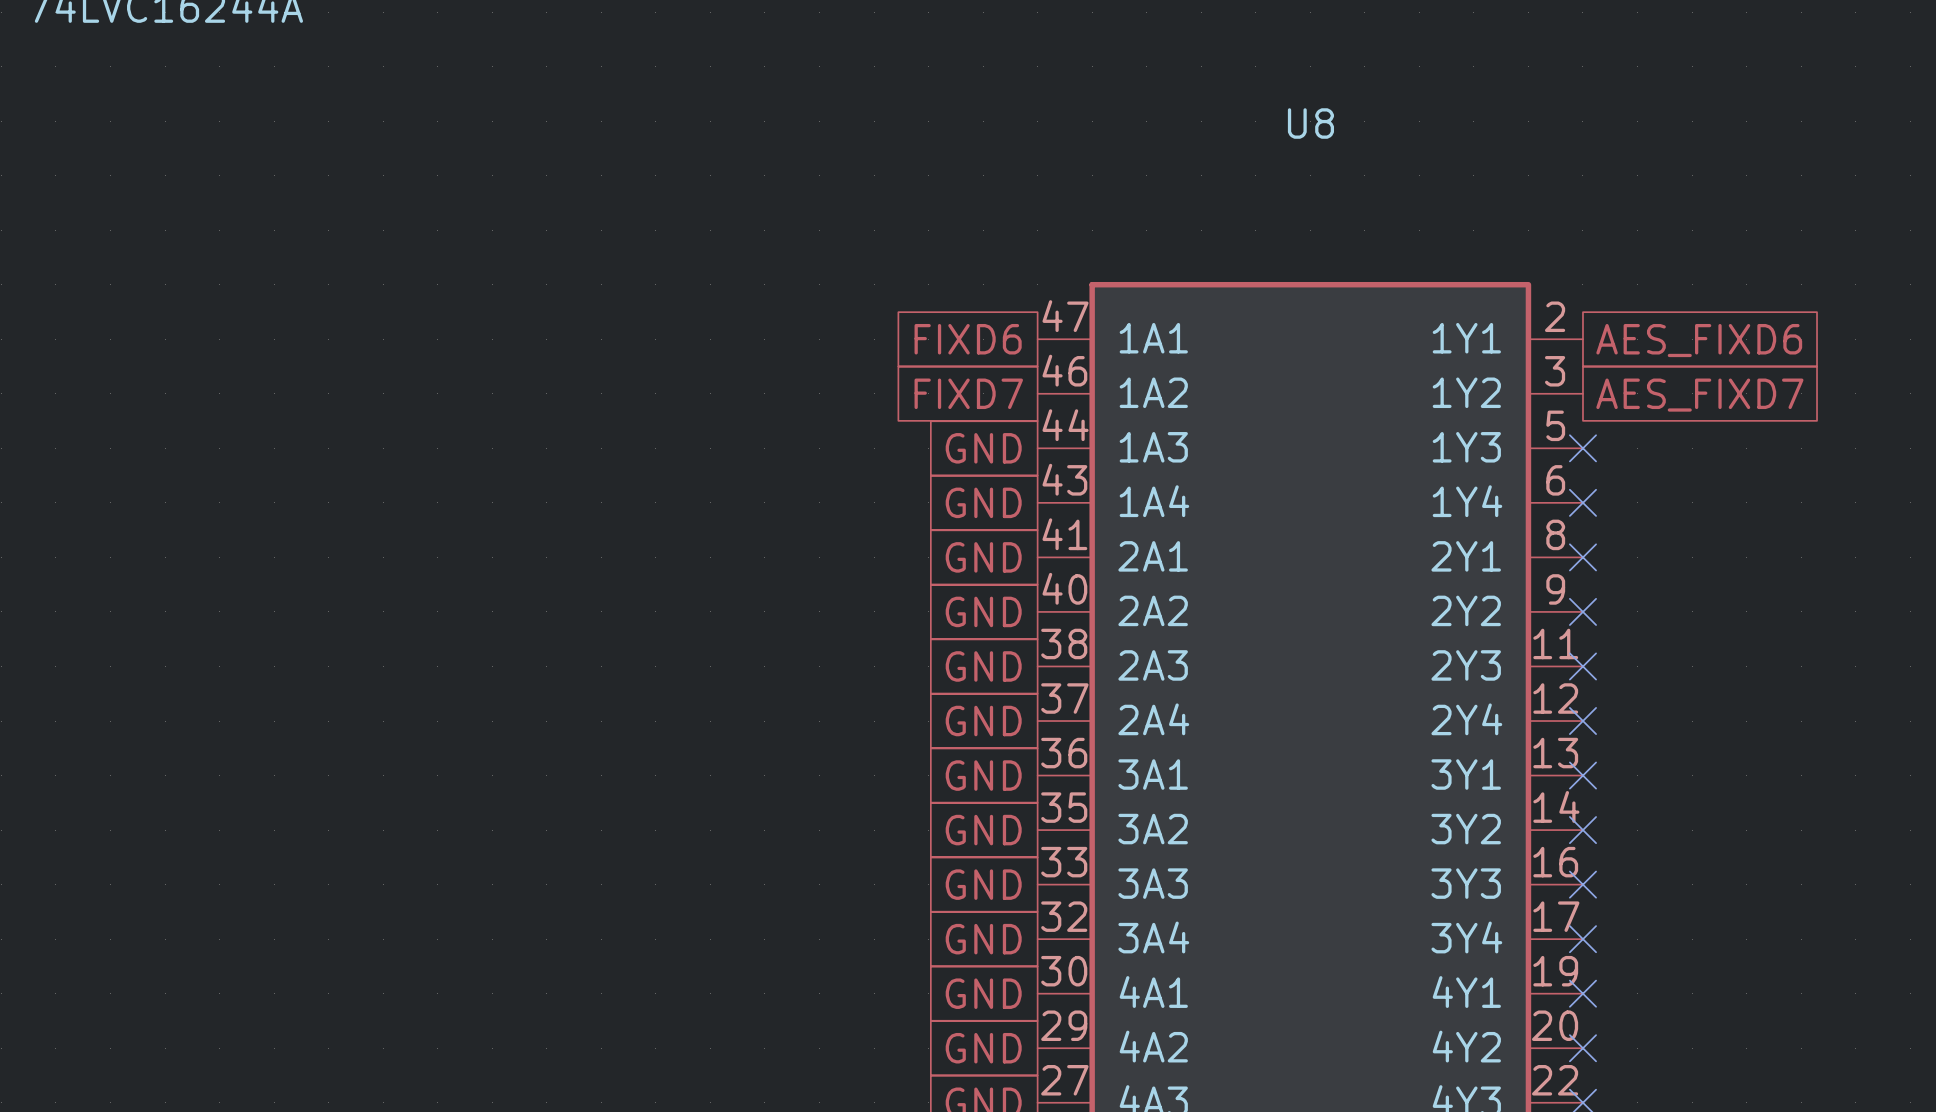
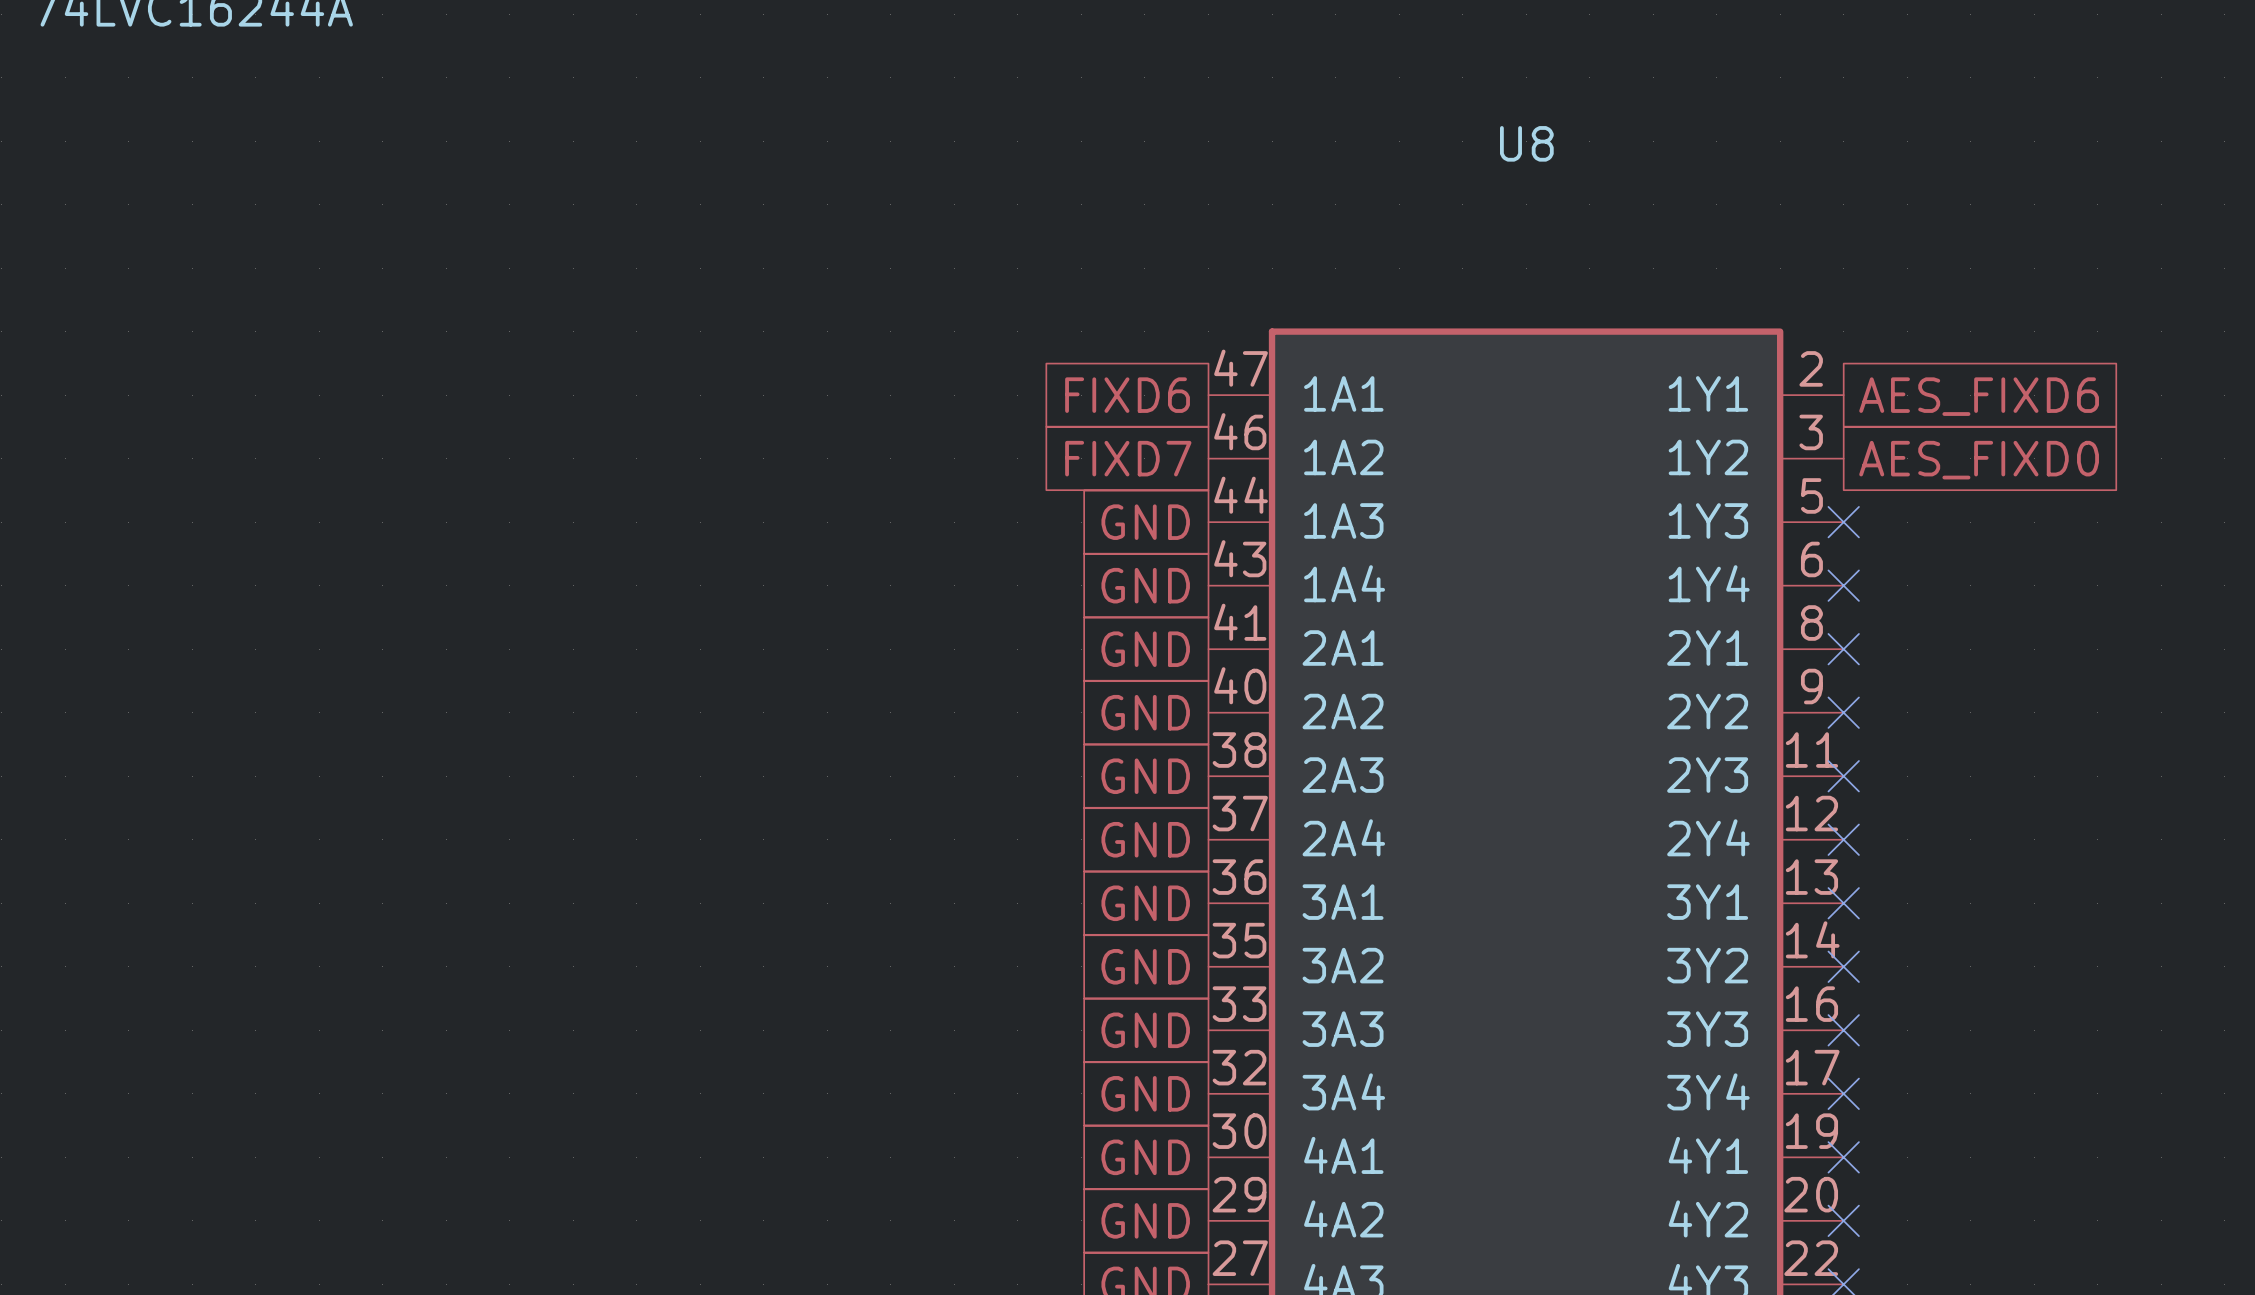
global label: AES_FIXD7 (1699, 395) -> AES_FIXD0 (1979, 460)

